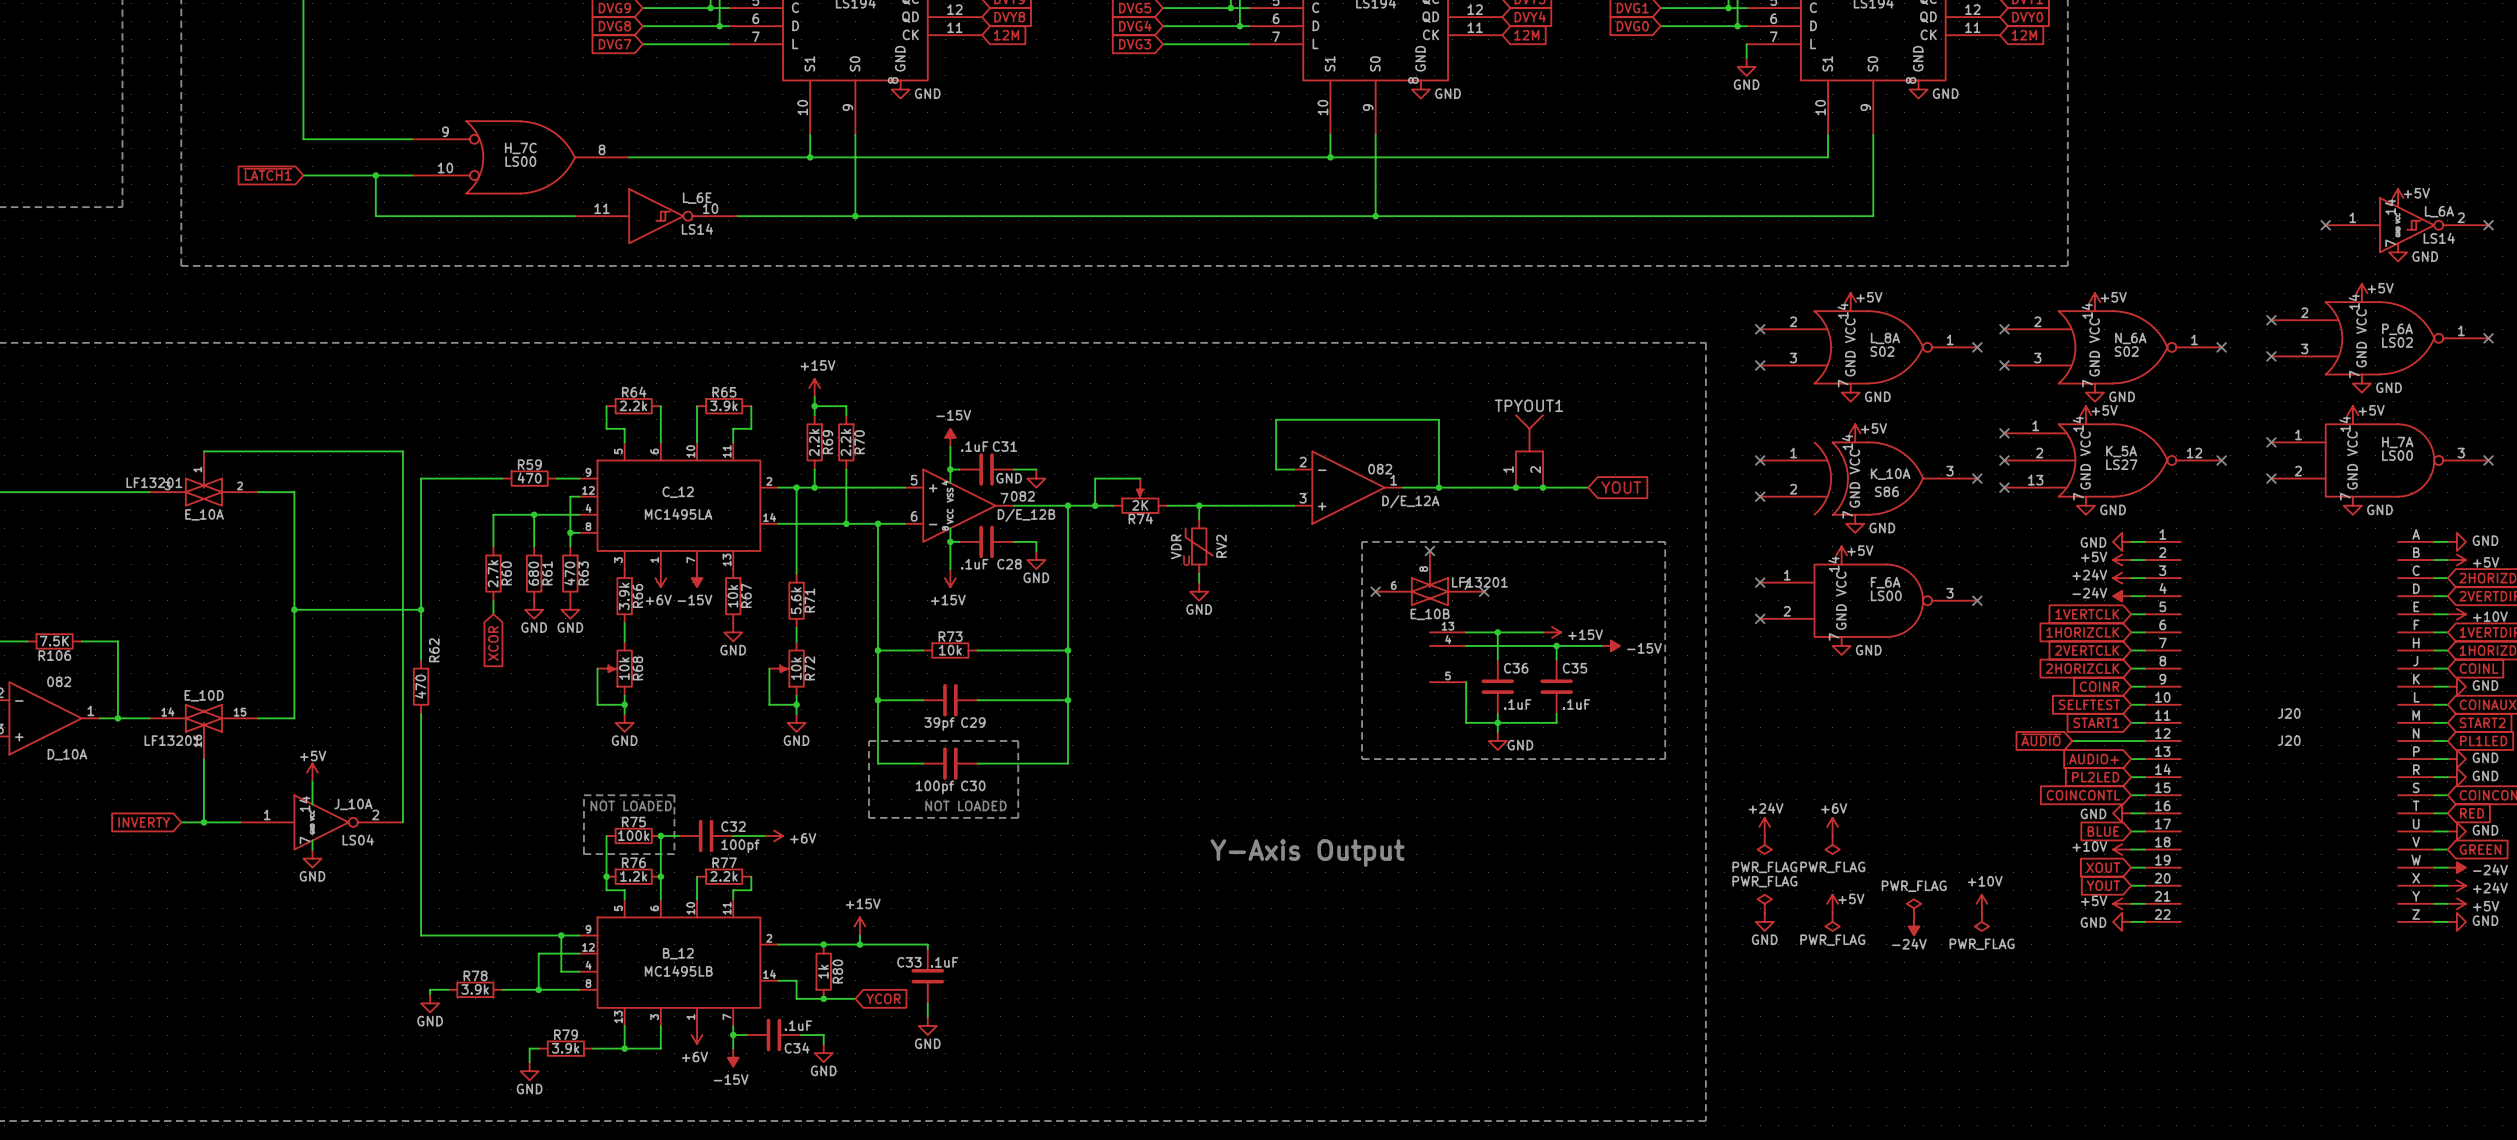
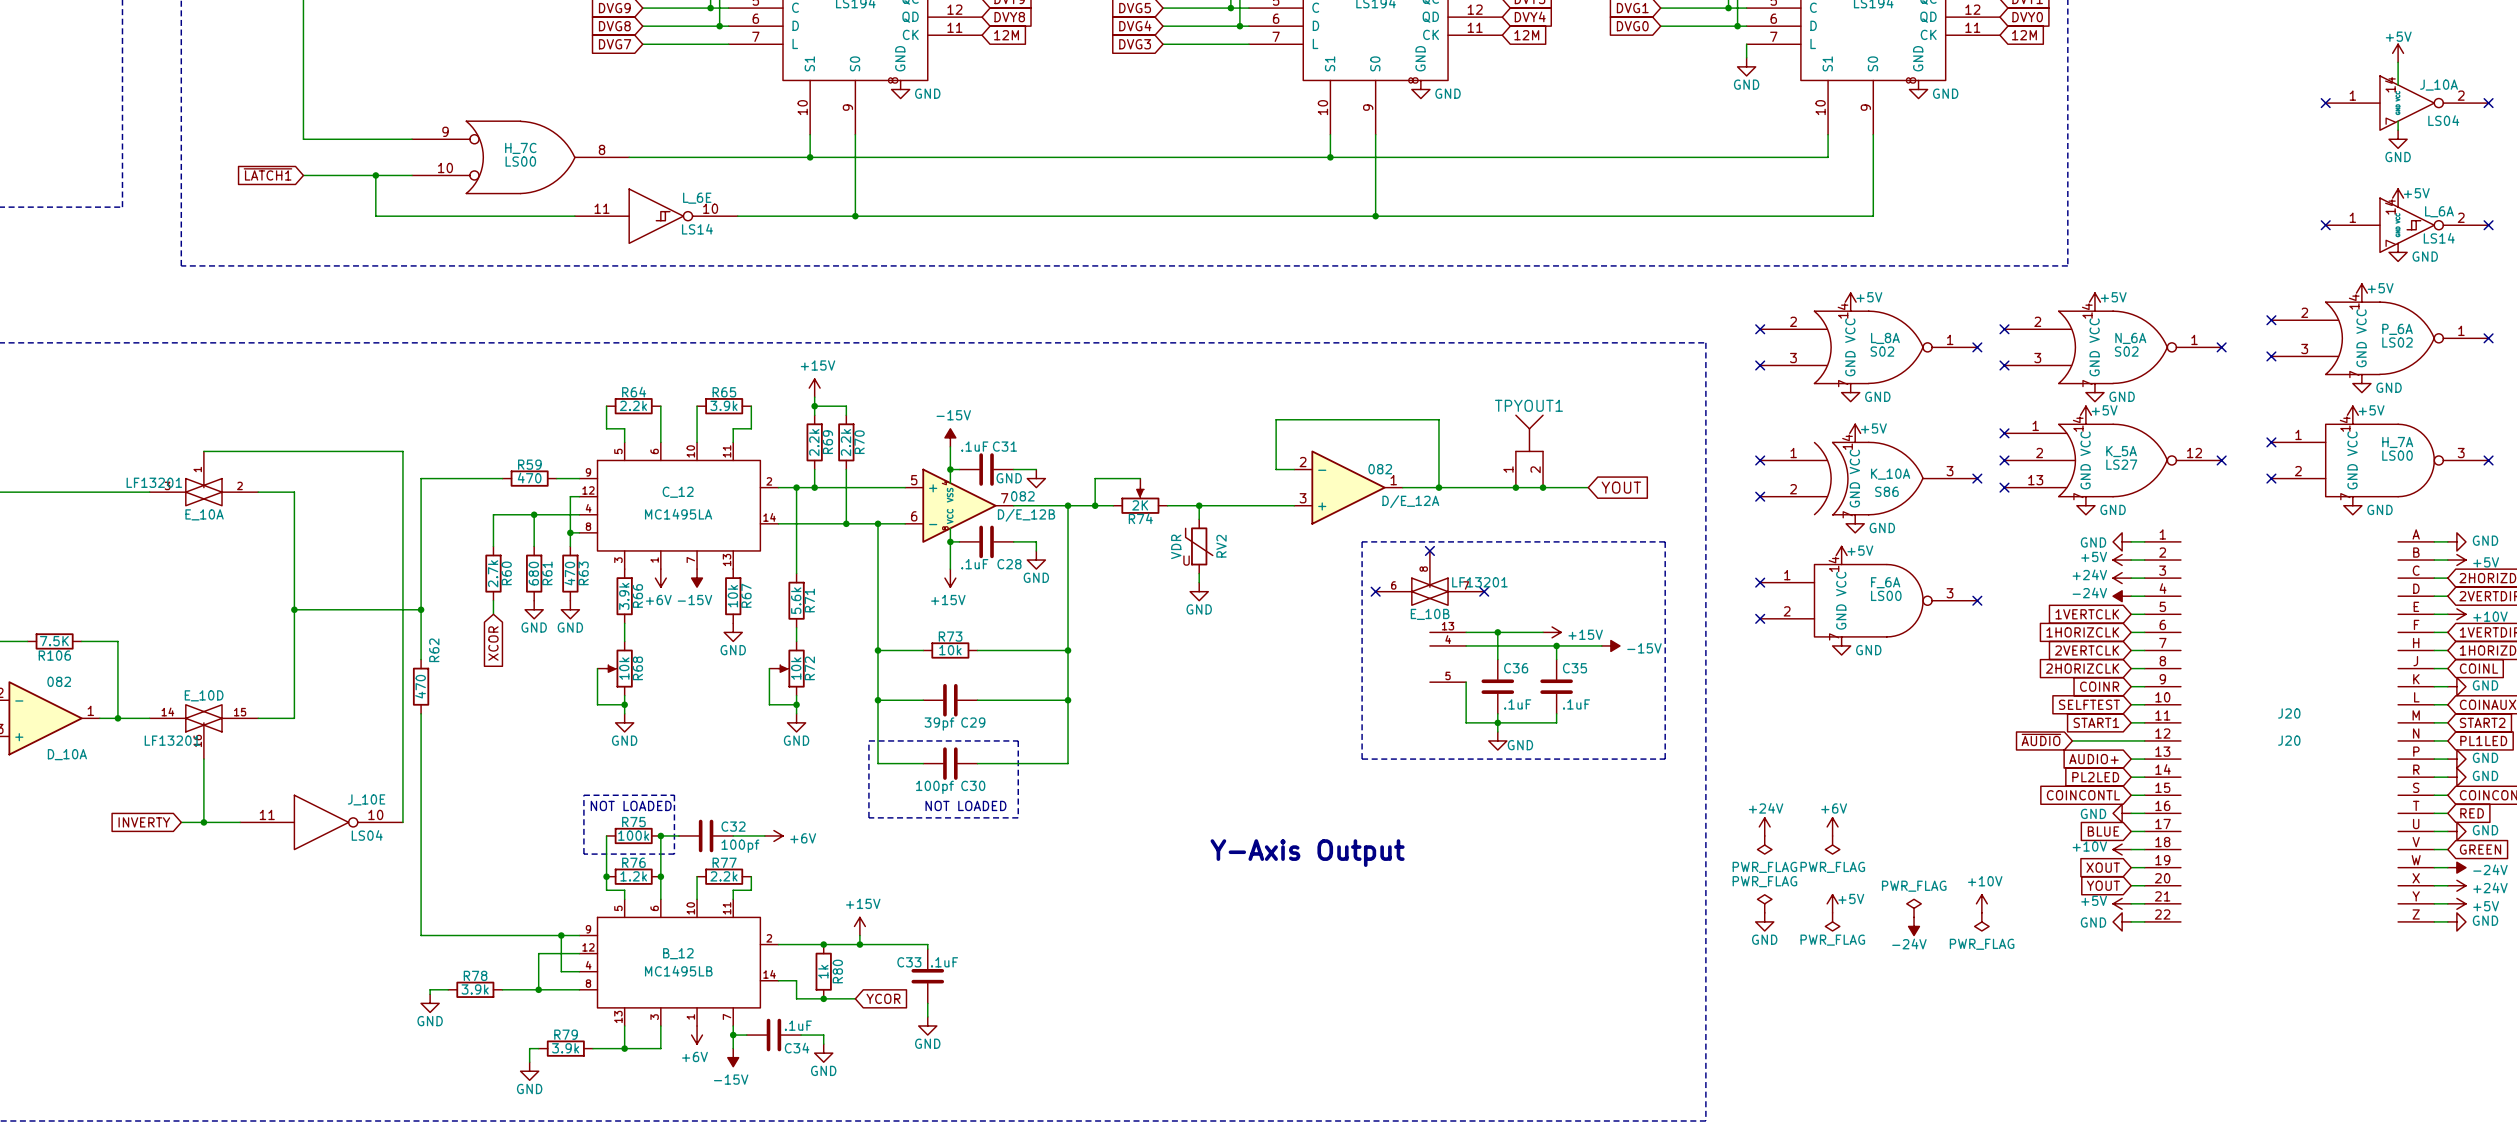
power symbol: none -> +5V (2398, 53)
wire: none -> (2398, 62) (2398, 84)
no-connect mark: none -> (2325, 103)
no-connect mark: none -> (2488, 103)
wire: none -> (2398, 121) (2398, 130)
power symbol: none -> GND (2398, 139)
power symbol: +5V (312, 772) -> none
wire: (312, 781) (312, 804) -> none
J_10A position: (321, 822) -> (2407, 103)
J_10E: none -> LS04 (321, 822)
wire: (312, 840) (312, 849) -> none
power symbol: GND (312, 858) -> none

